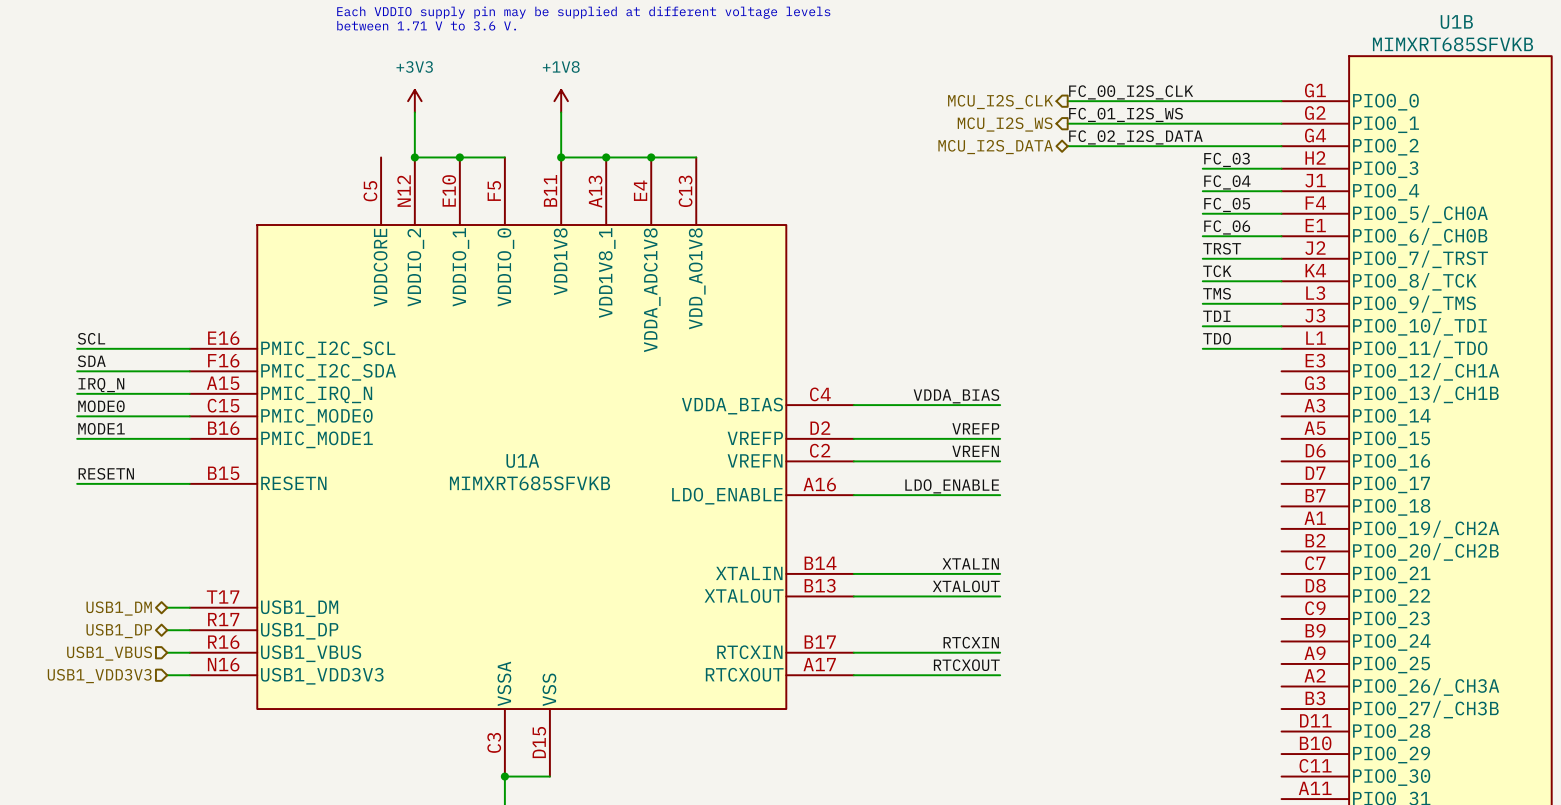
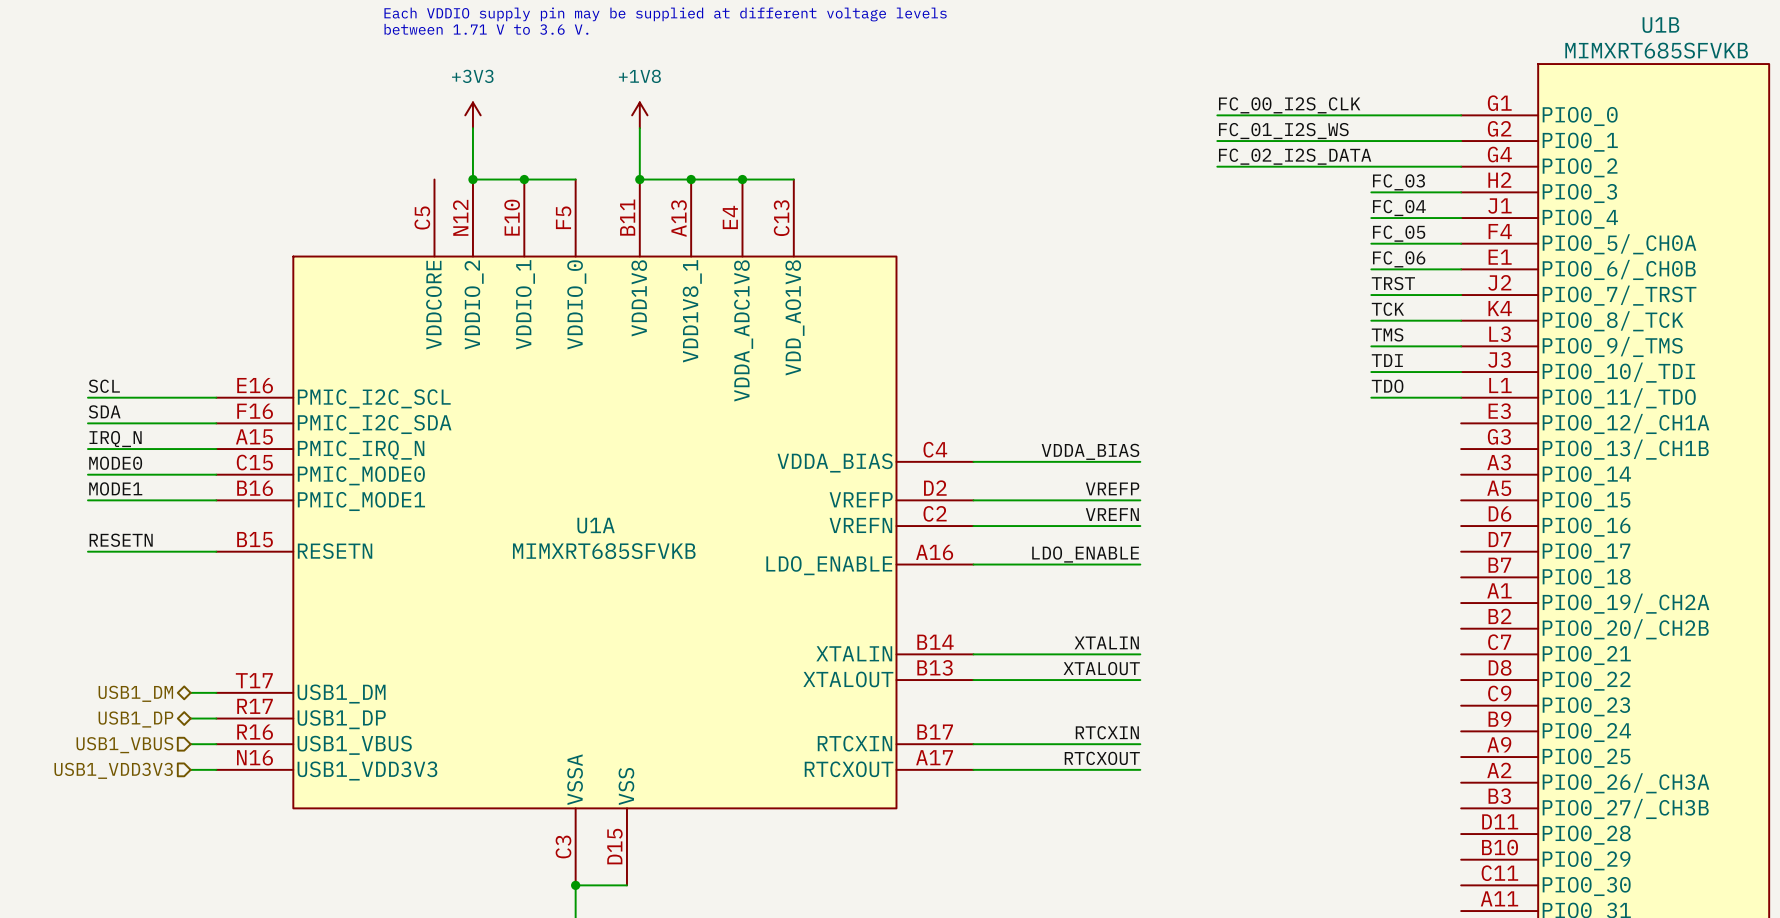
hierarchical label: MCU_I2S_CLK (1000, 102) -> none
hierarchical label: MCU_I2S_WS (1005, 124) -> none
hierarchical label: MCU_I2S_DATA (995, 147) -> none

